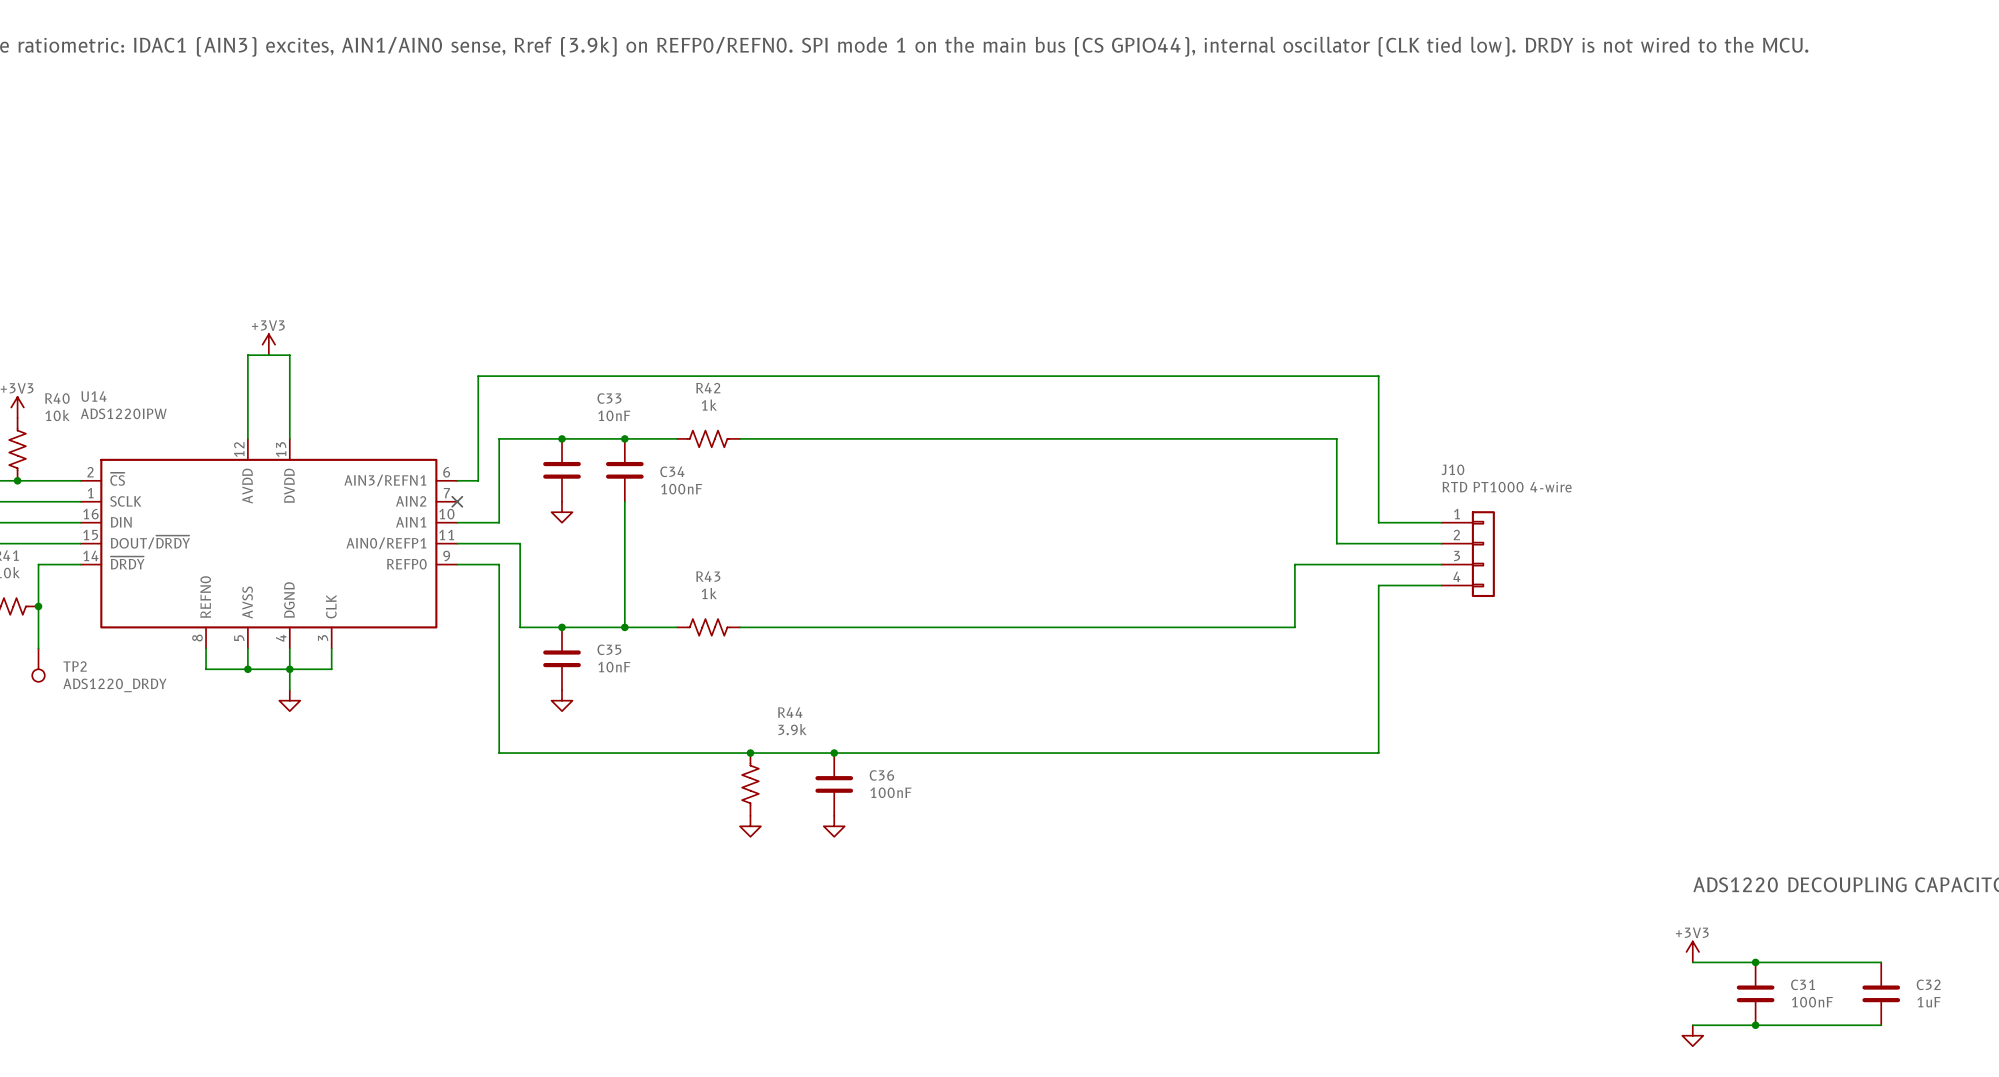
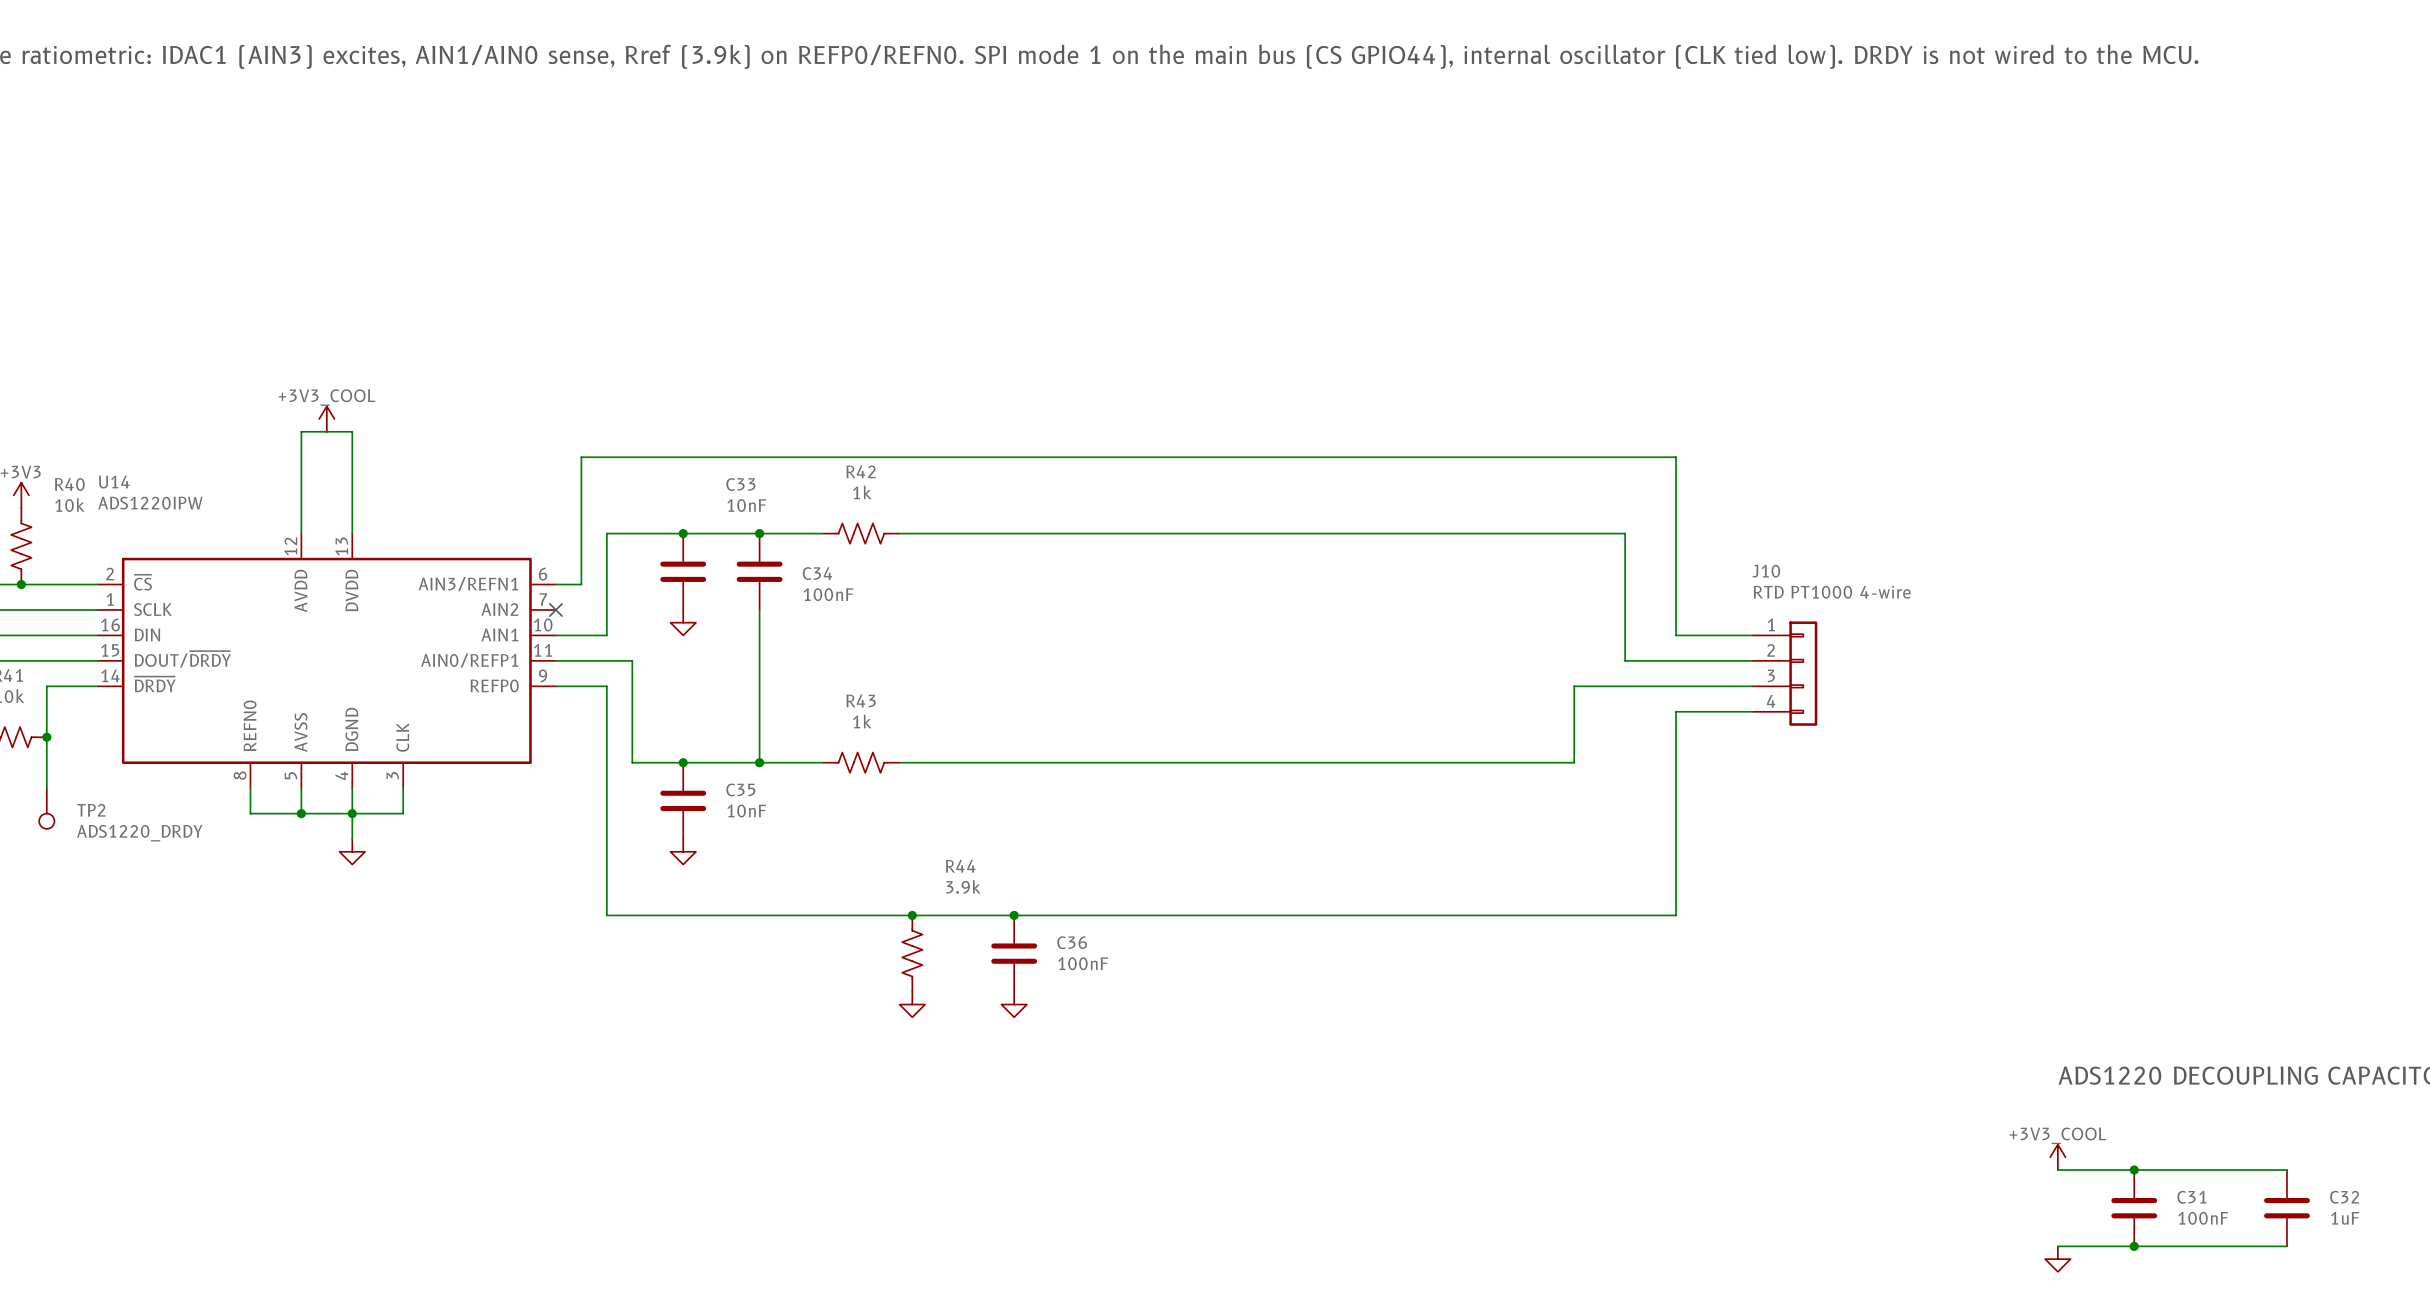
power symbol: +3V3 (268, 344) -> +3V3_COOL (326, 419)
power symbol: +3V3 (1692, 951) -> +3V3_COOL (2057, 1157)

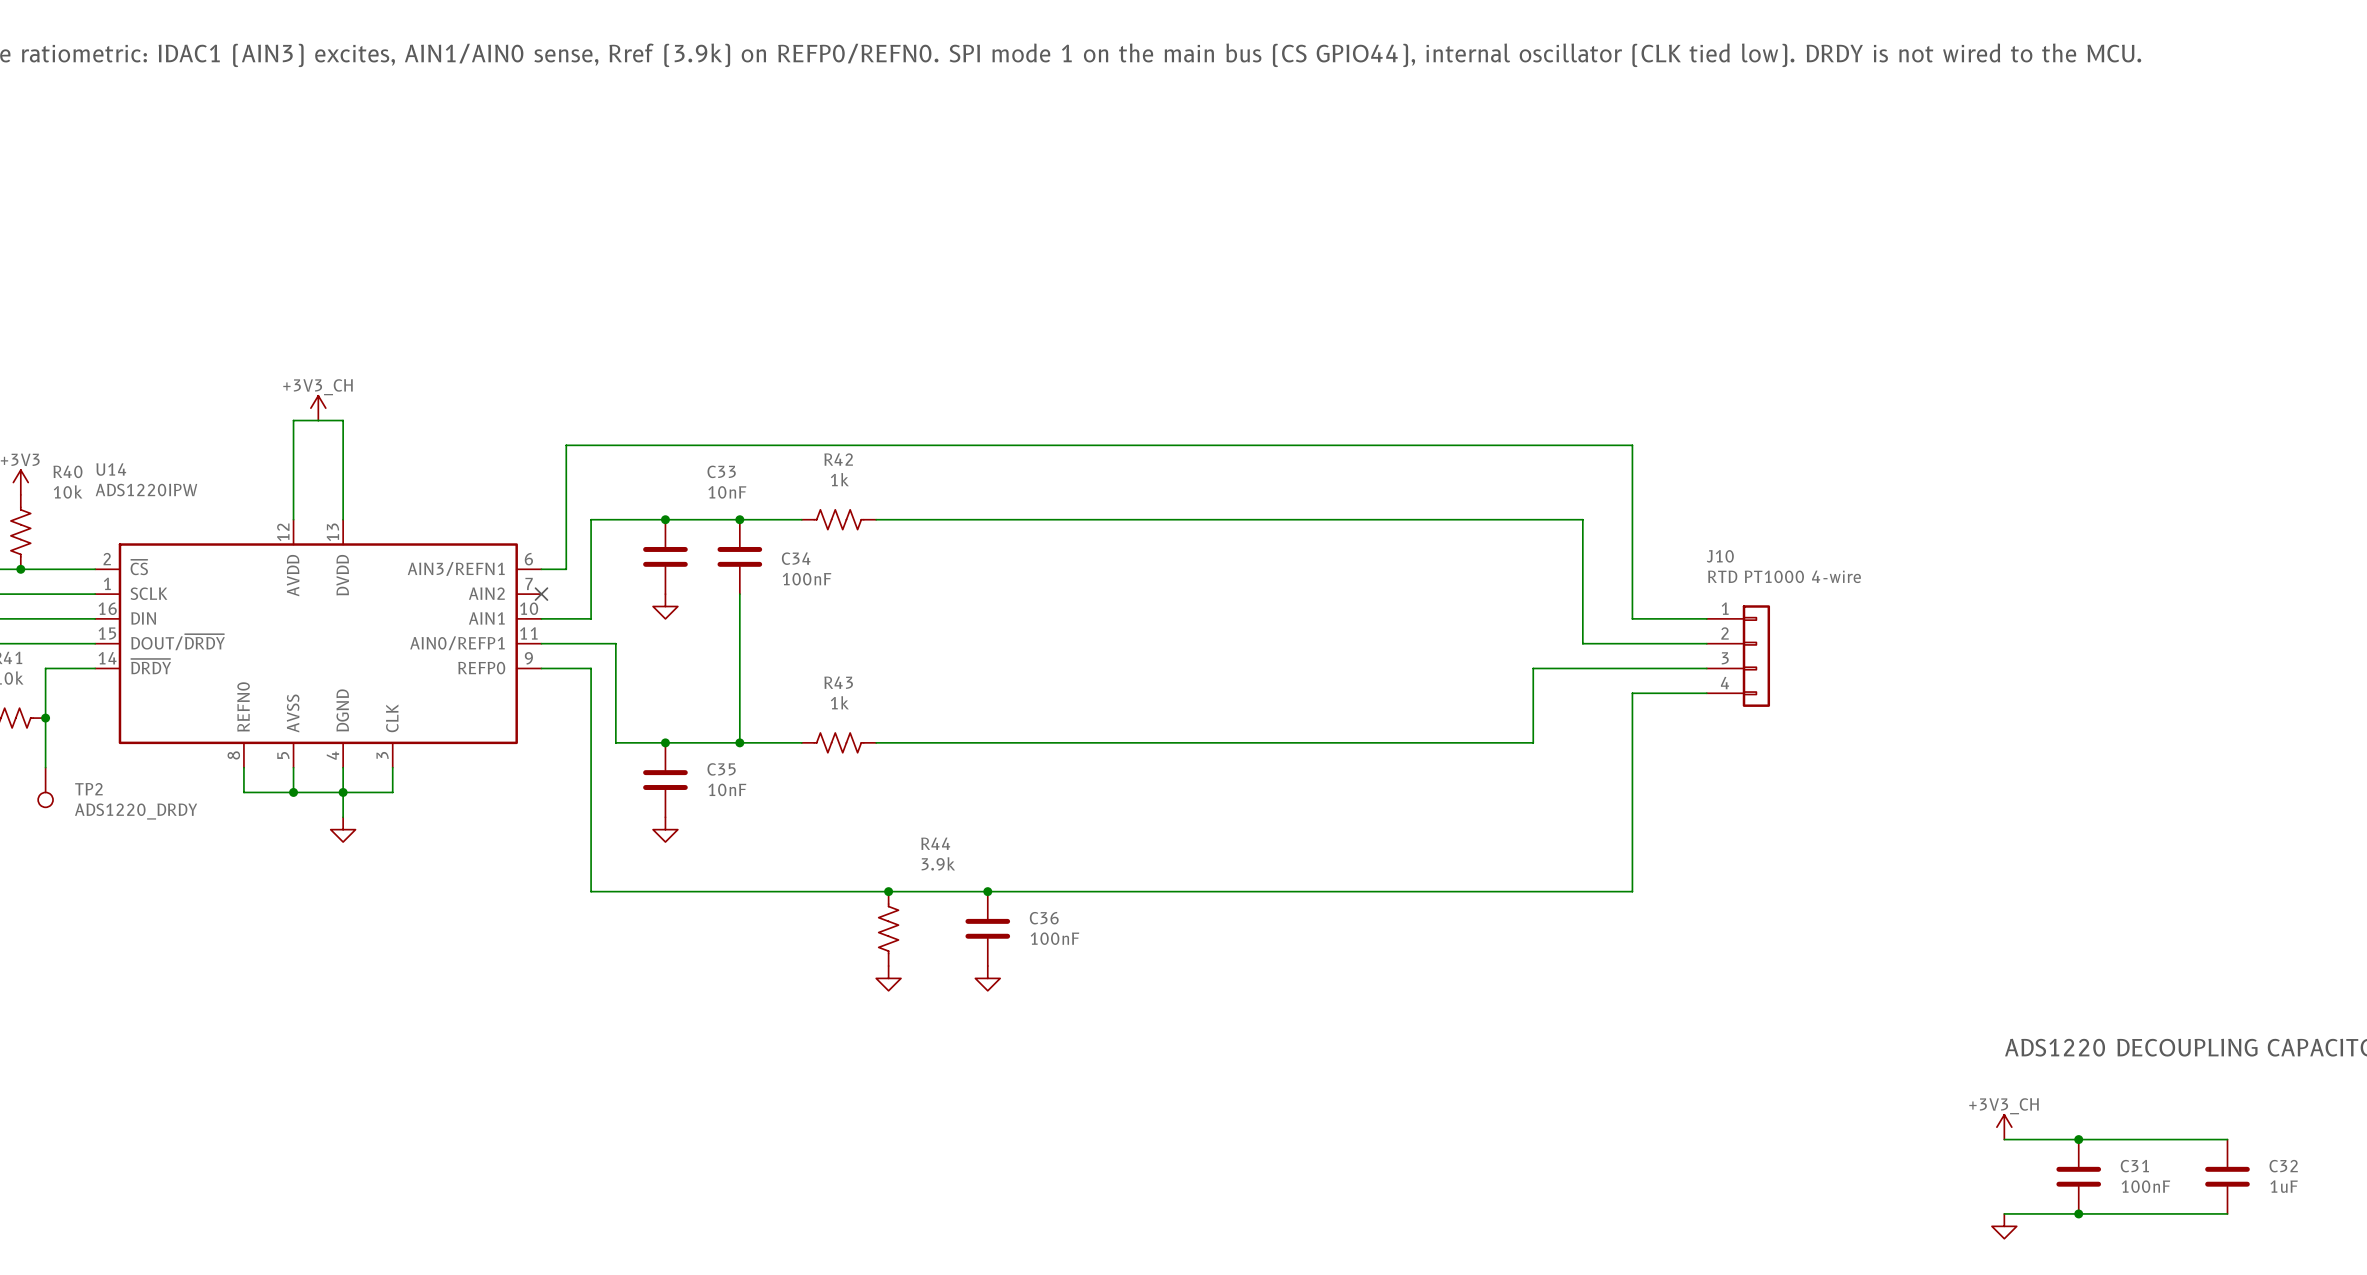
power symbol: +3V3_COOL (326, 419) -> +3V3_CH (318, 408)
power symbol: +3V3_COOL (2057, 1157) -> +3V3_CH (2004, 1127)

